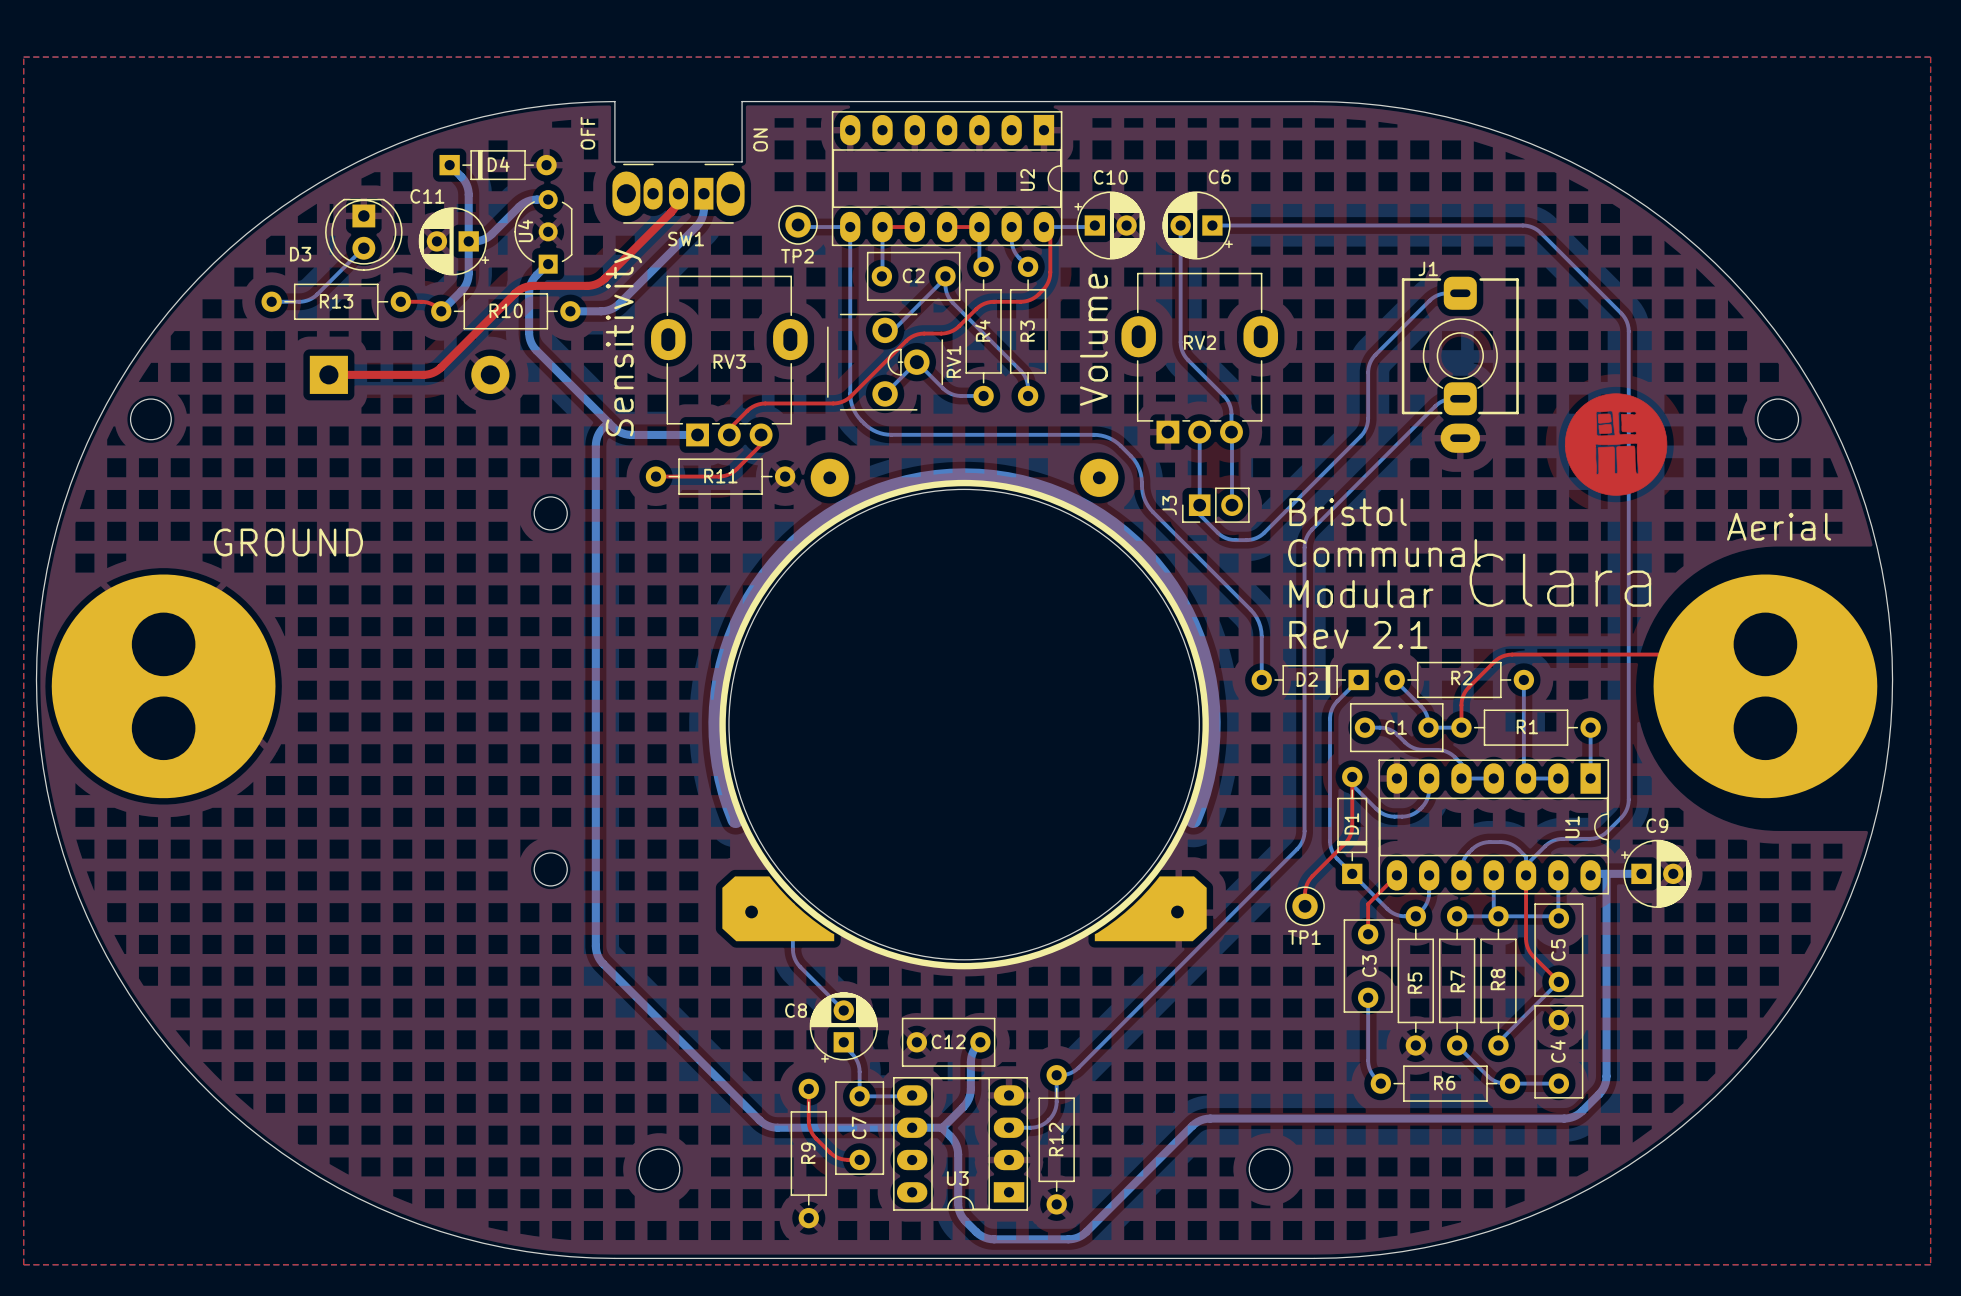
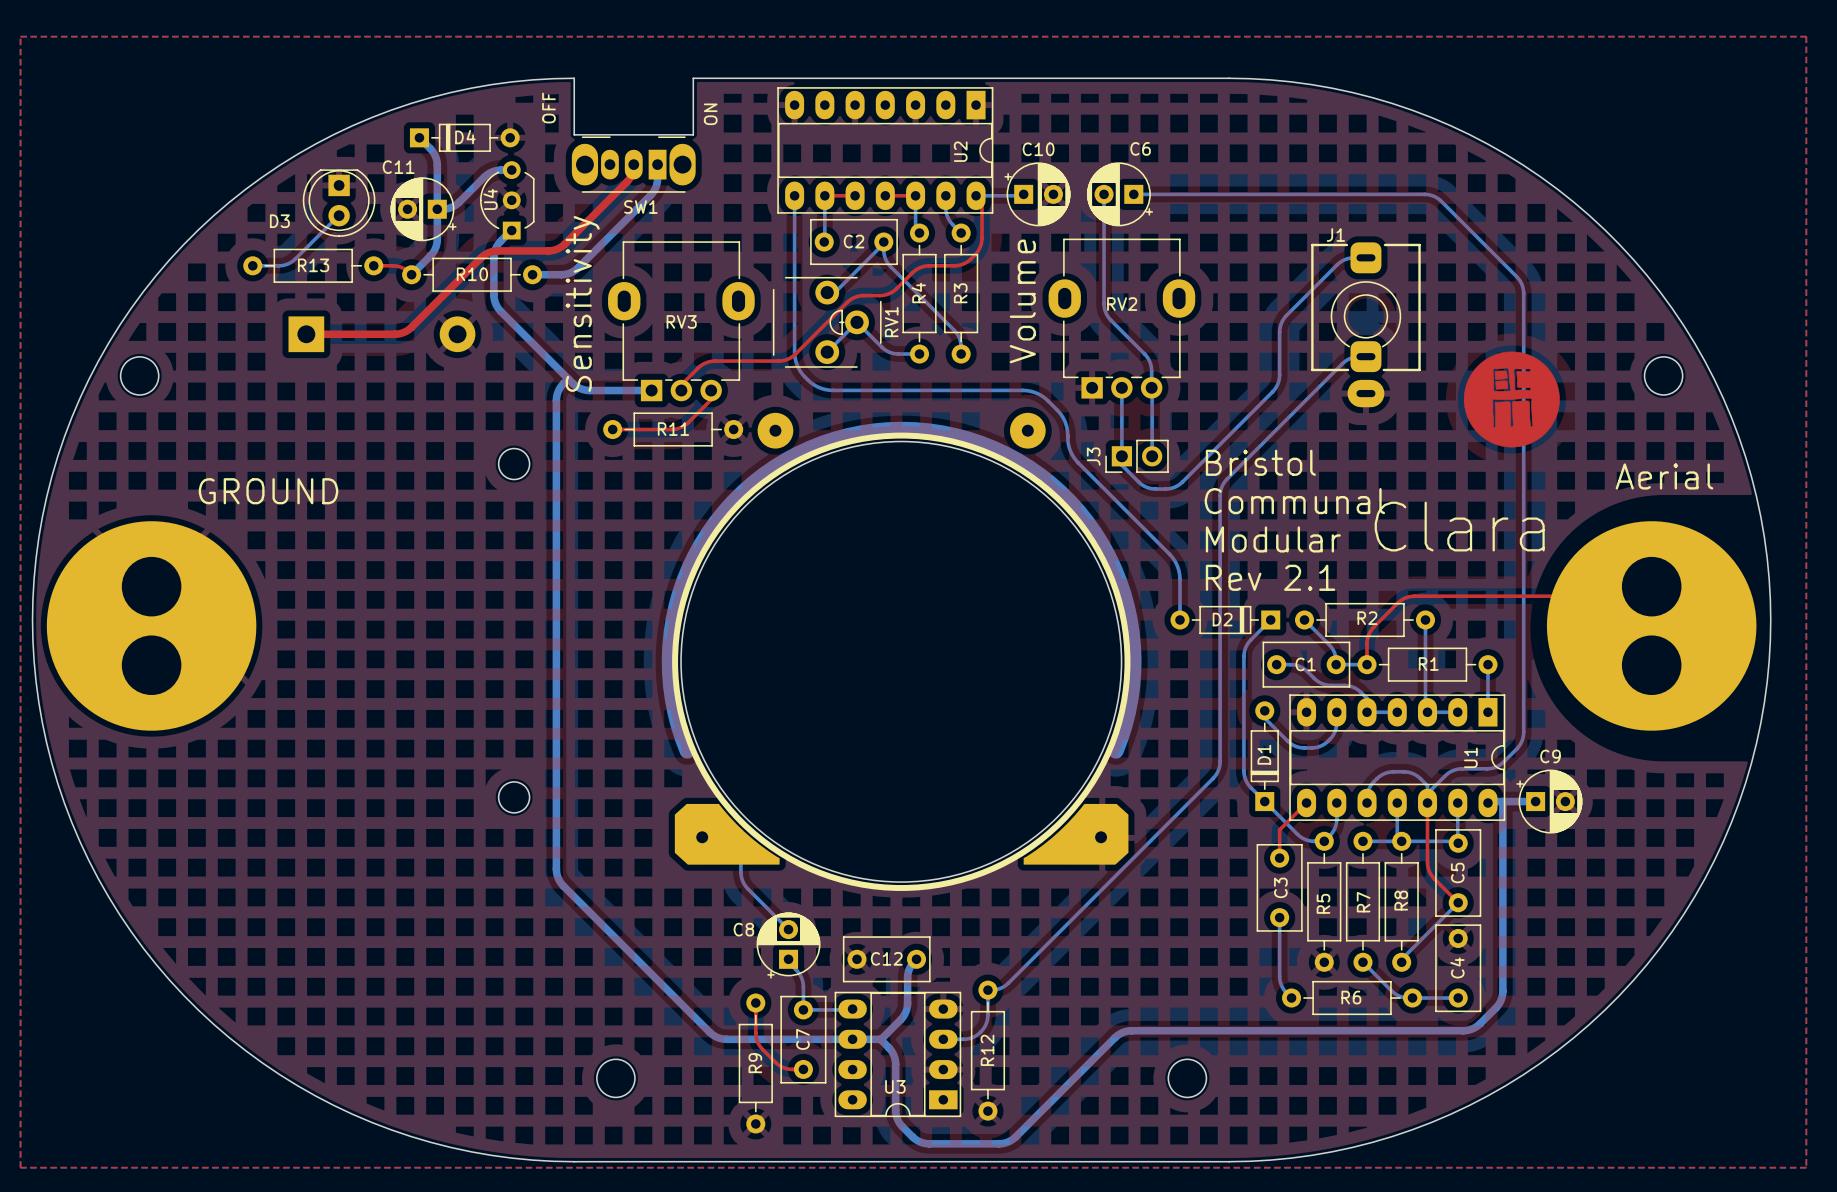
bottom track: (798, 224) (800, 227) (850, 227) -> none
TP2: (798, 224) -> none
top track: (1352, 776) (1352, 825) (1350, 835) (1308, 881) (1305, 890) (1305, 906) -> none
TP1: (1305, 906) -> none

